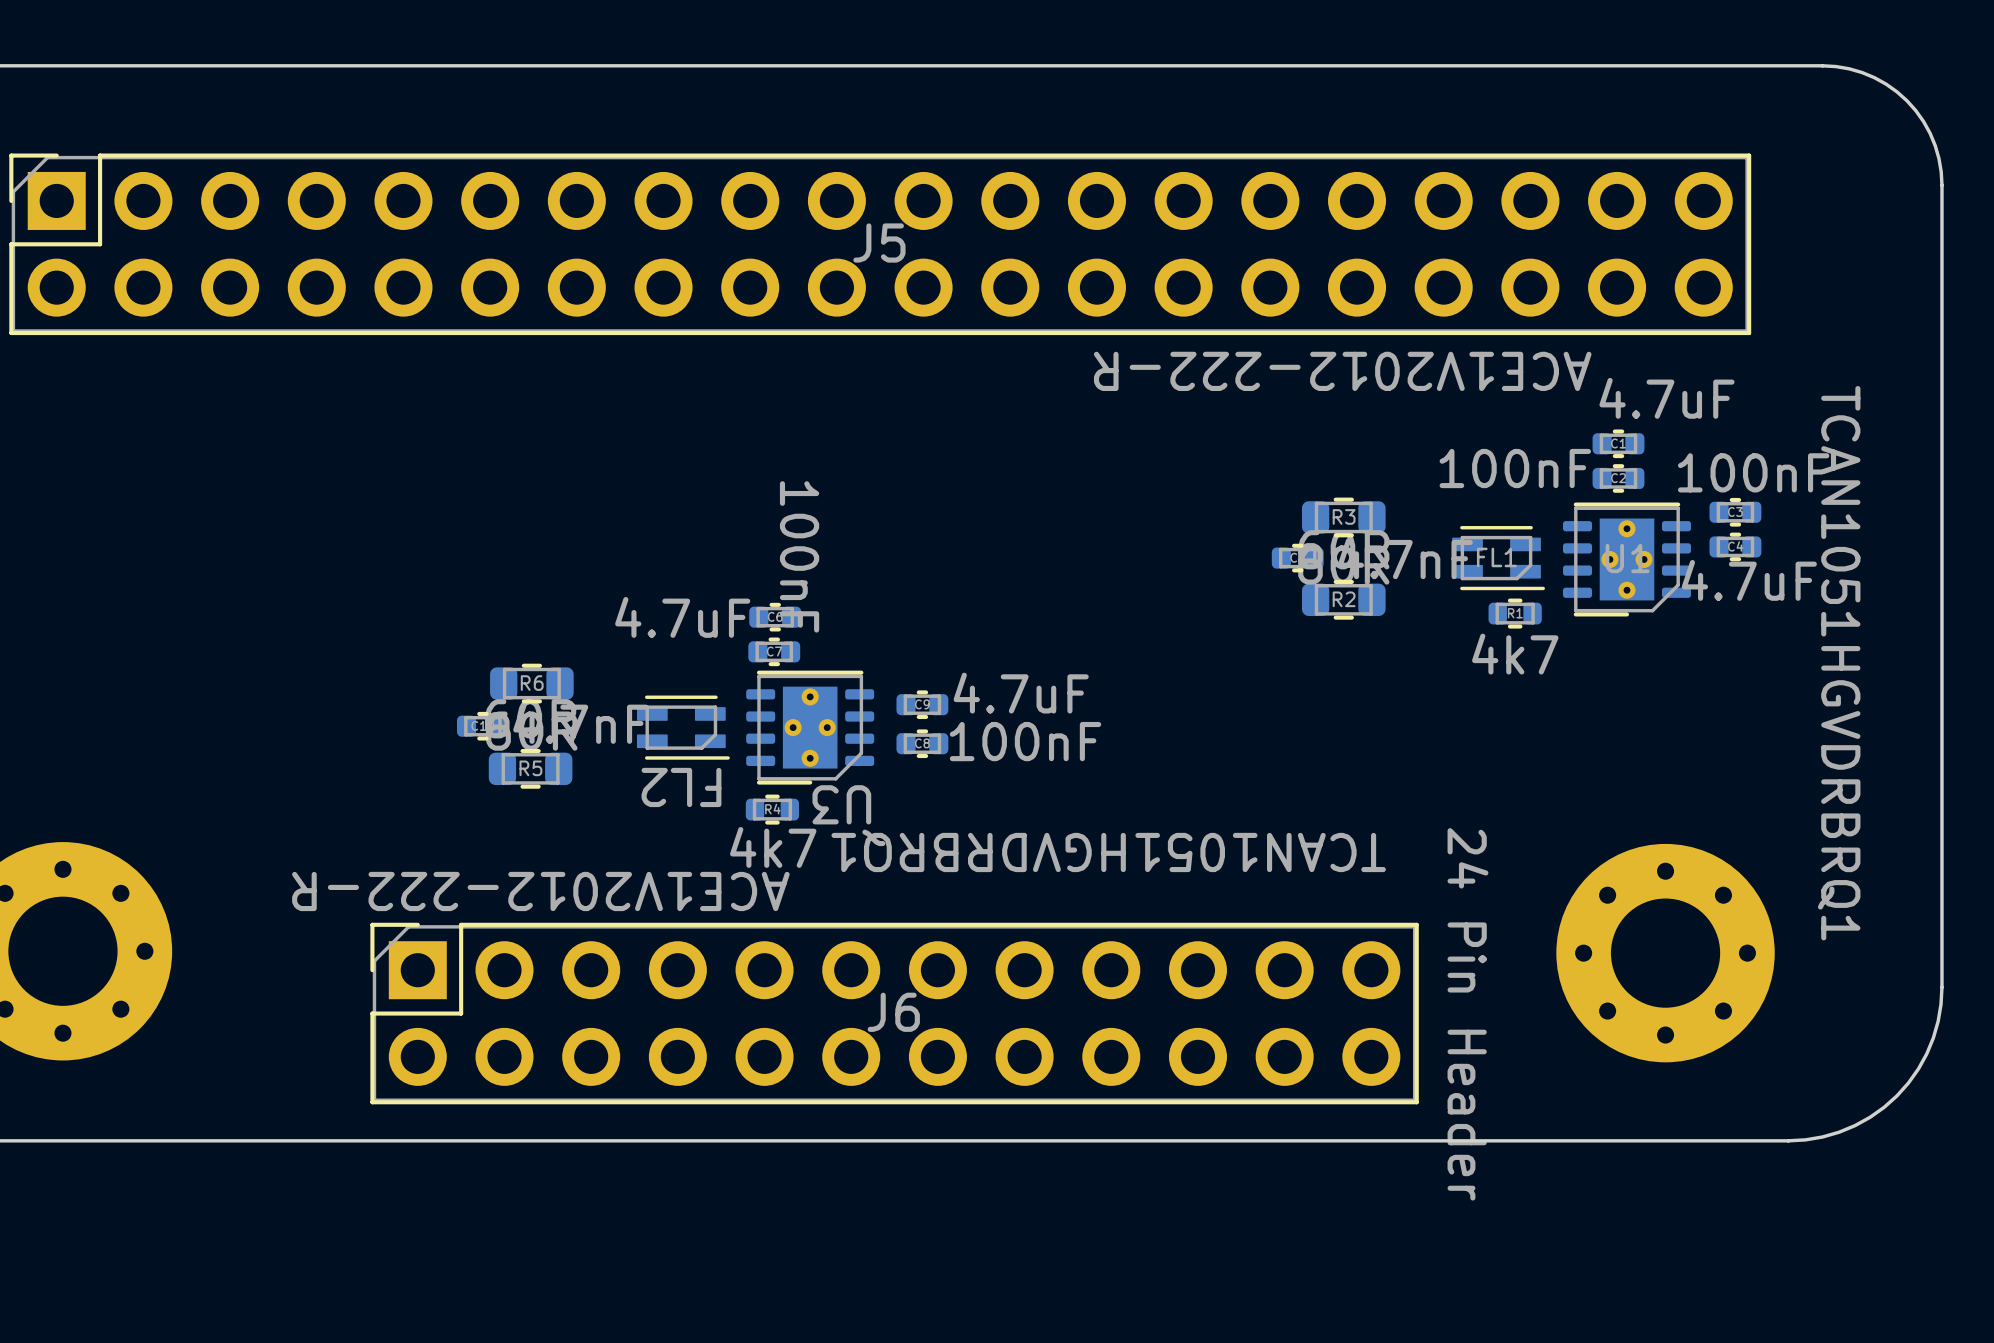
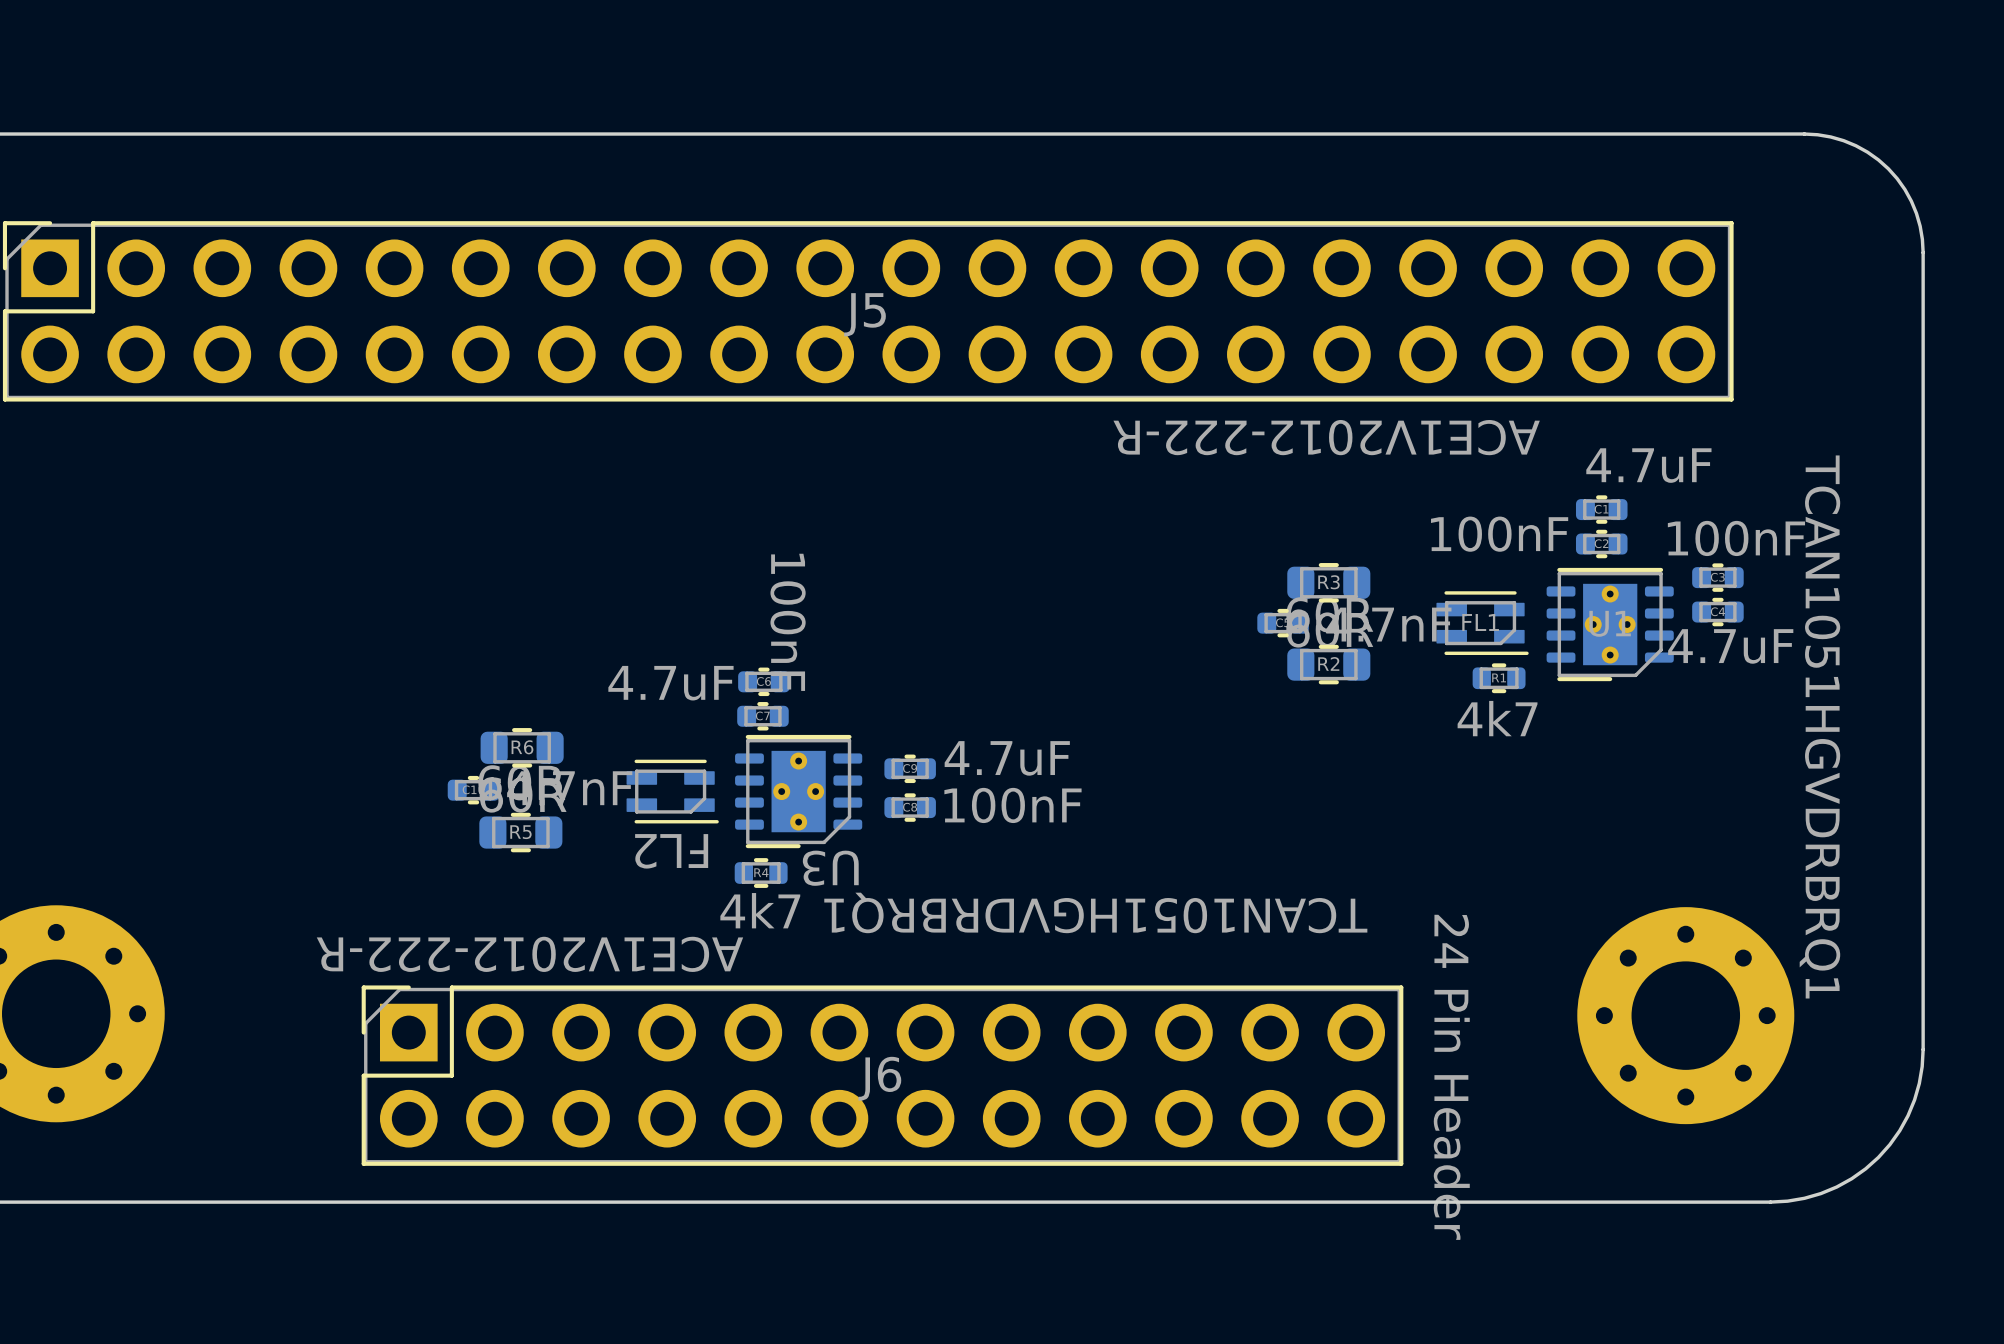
part position: (1665, 953) -> (1685, 1015)

